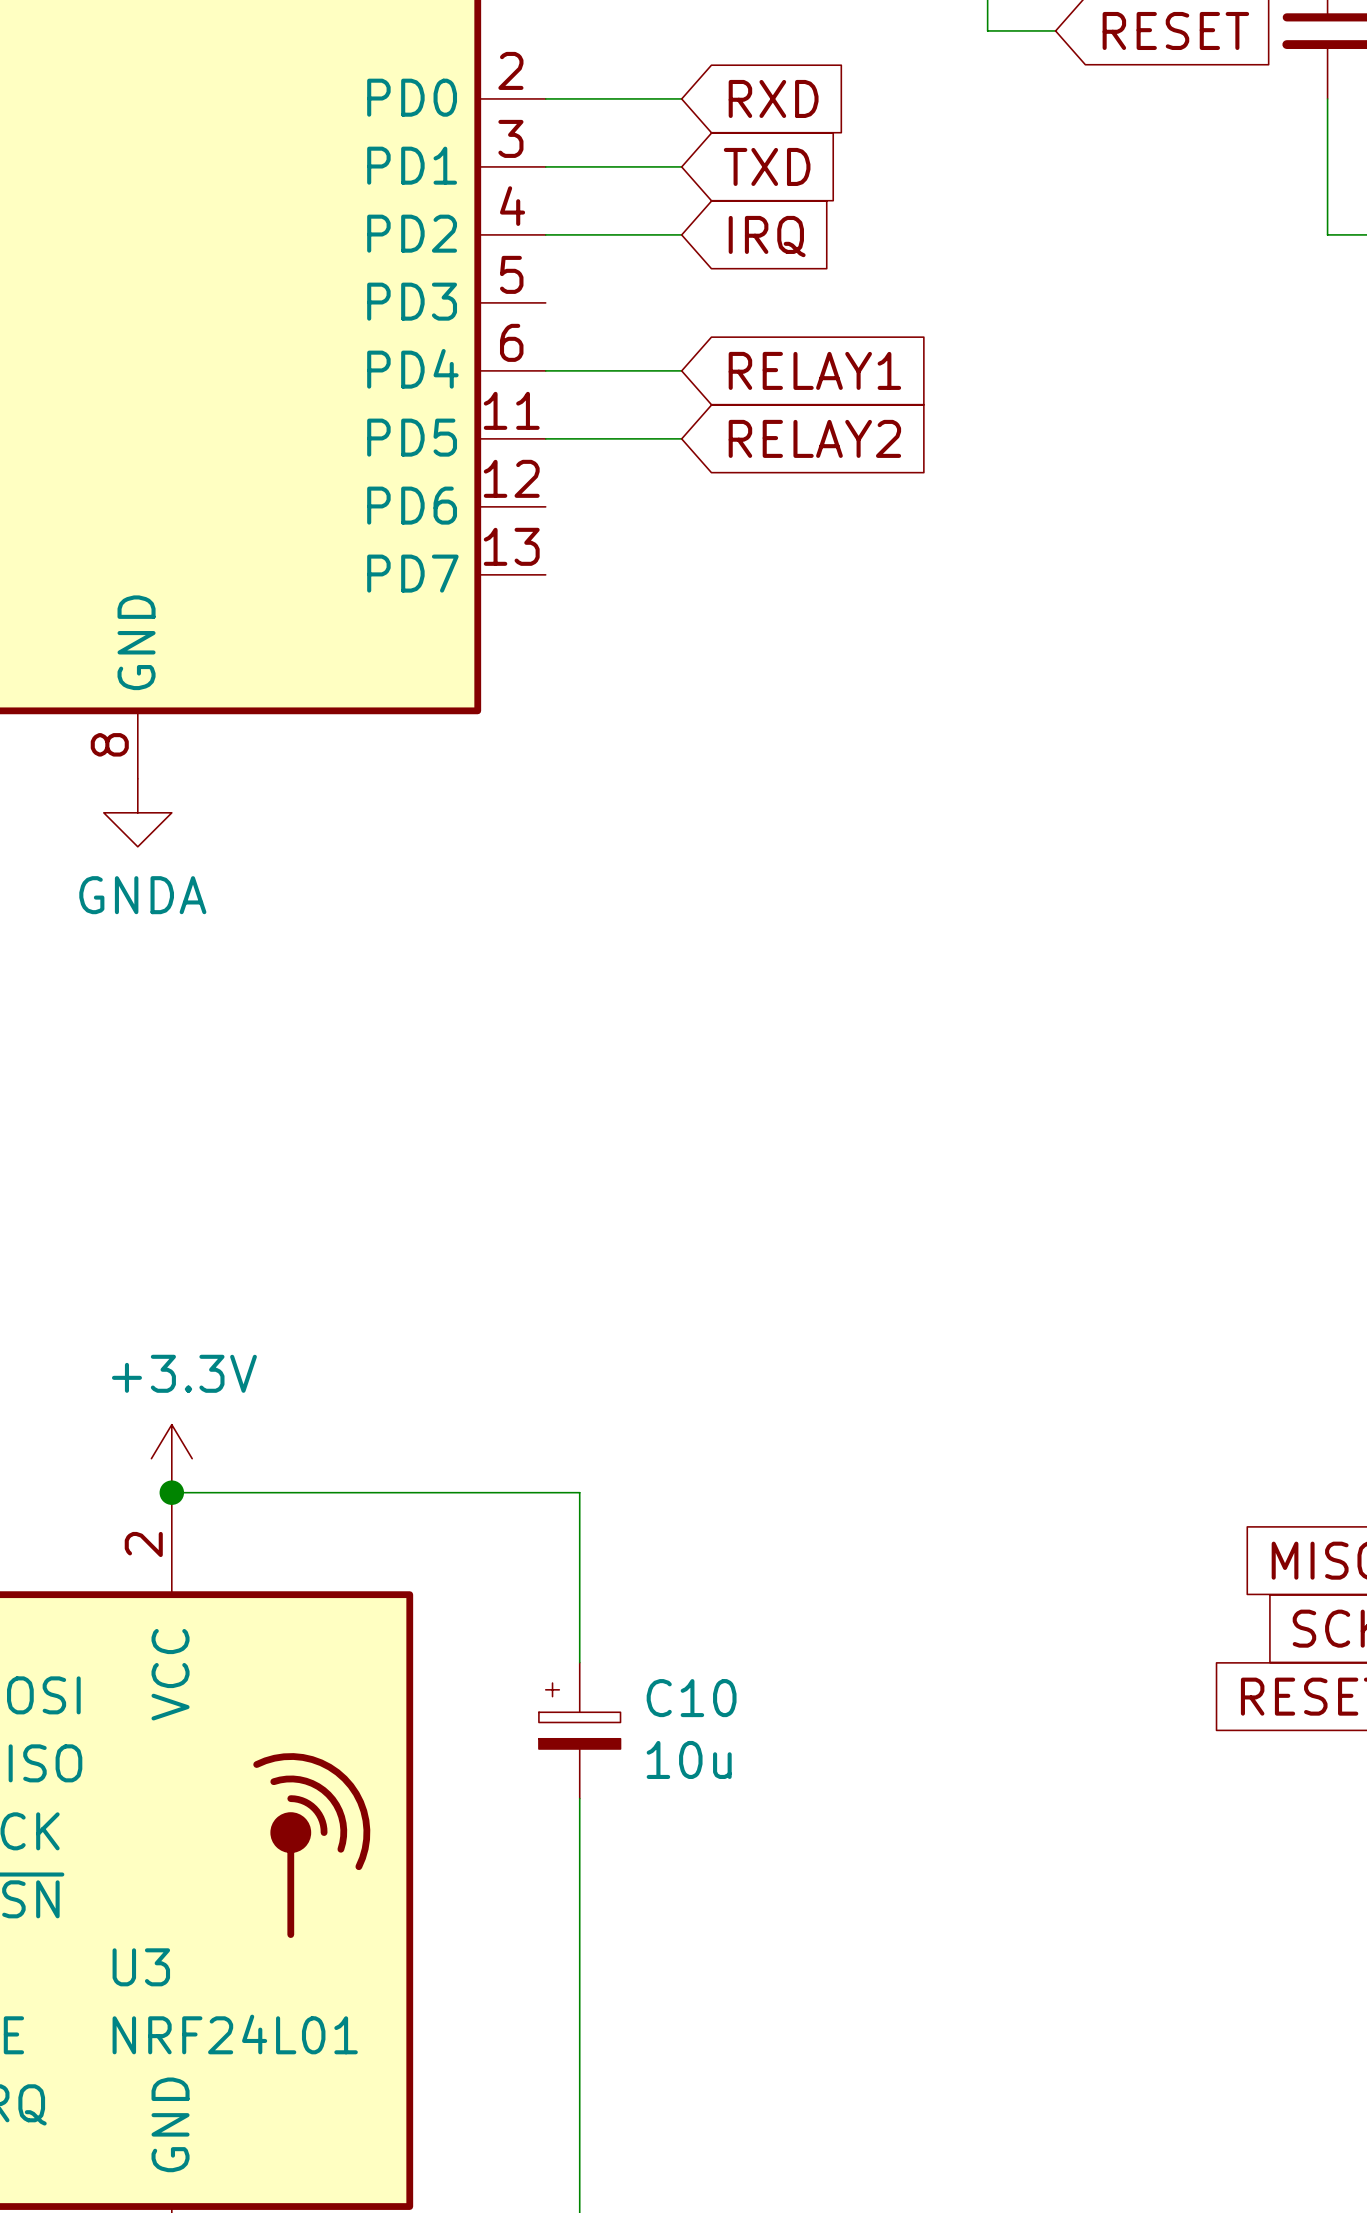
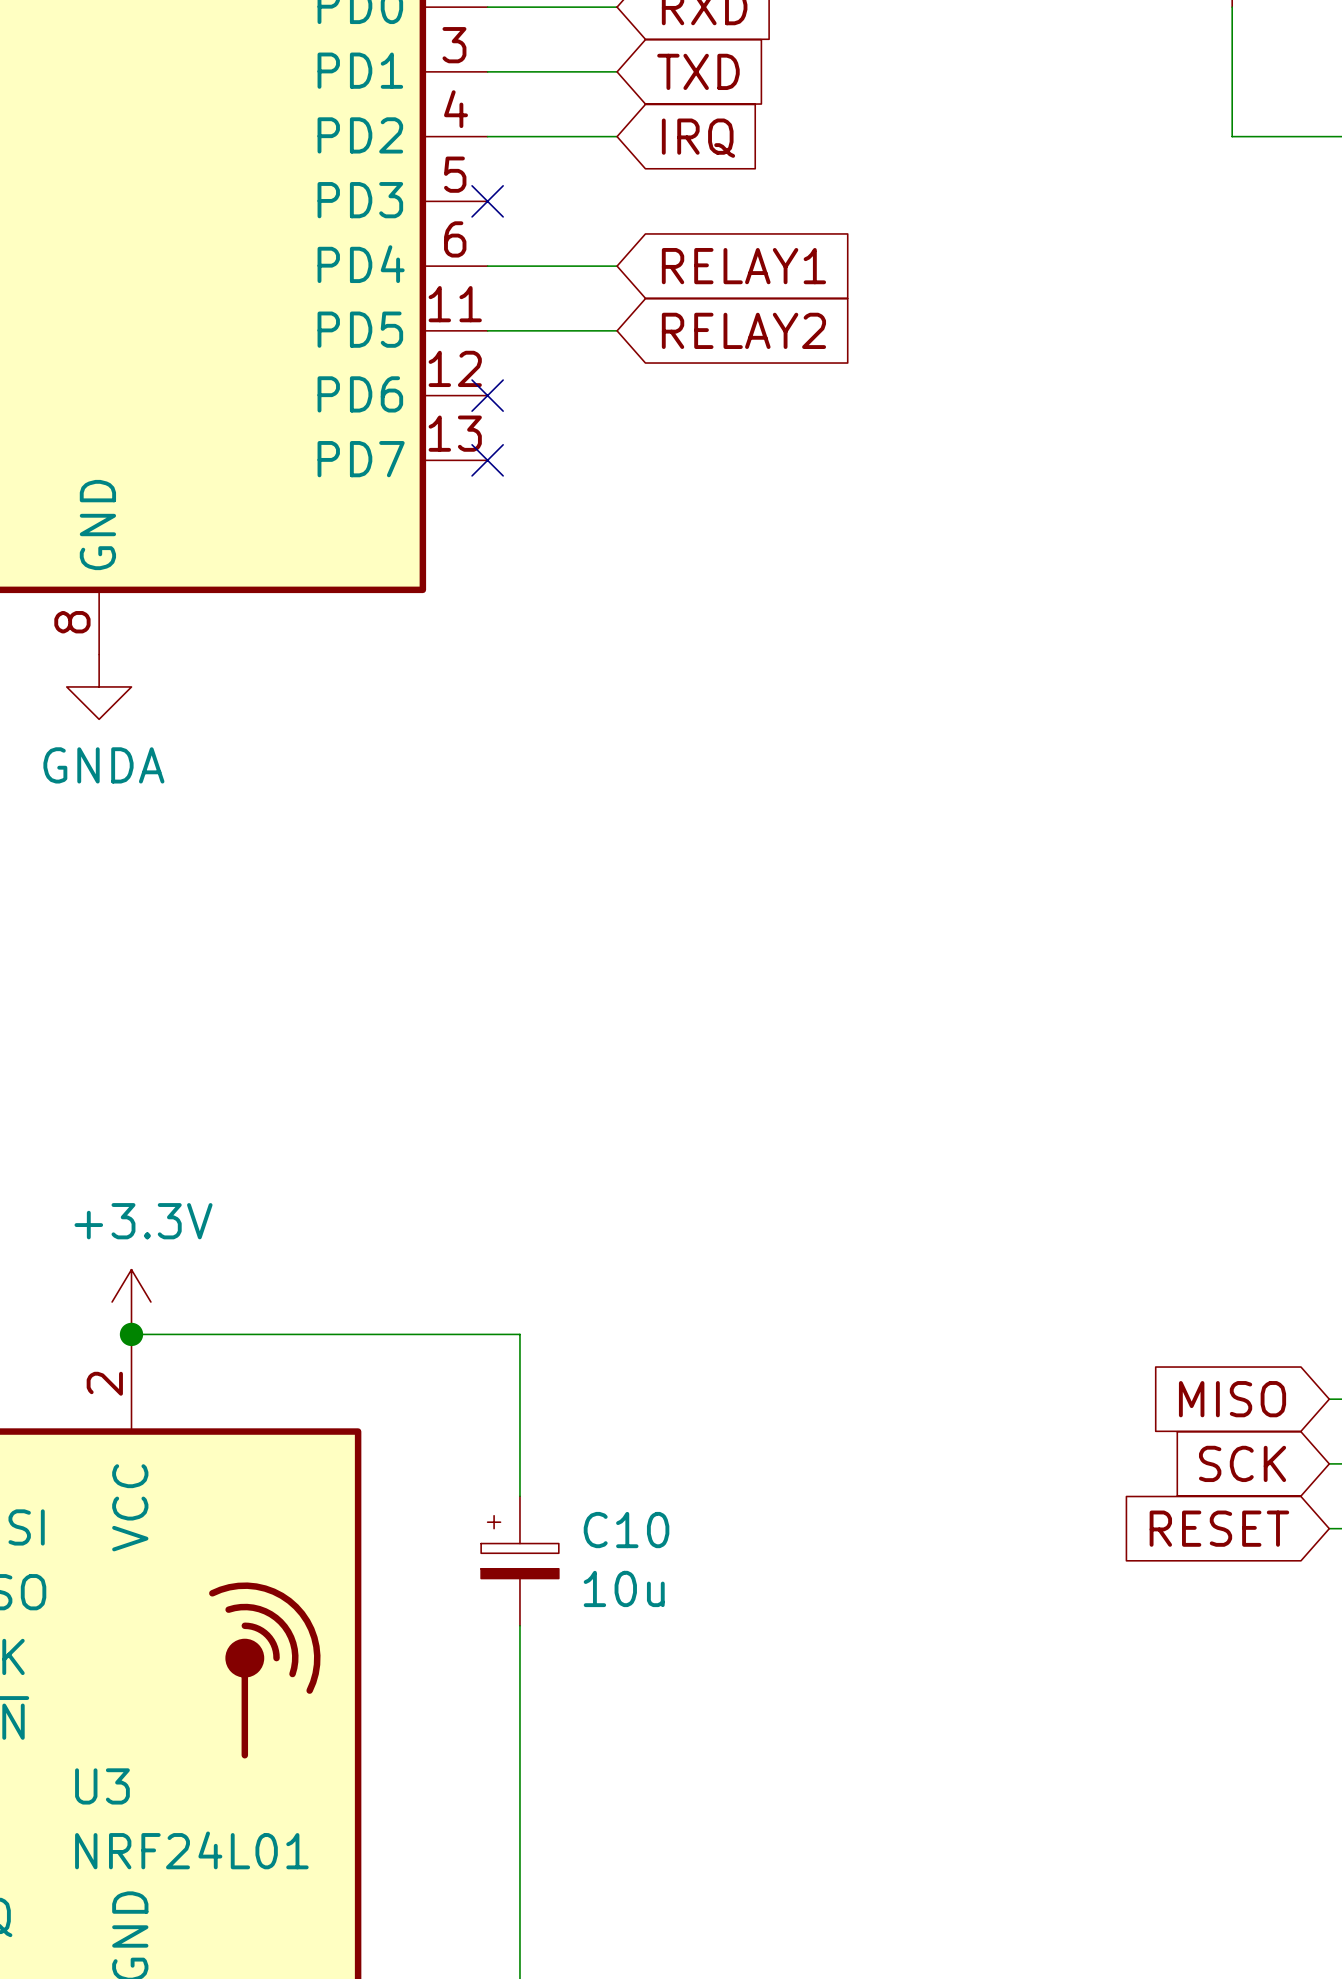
no-connect mark: none -> (487, 201)
no-connect mark: none -> (487, 395)
no-connect mark: none -> (487, 460)

